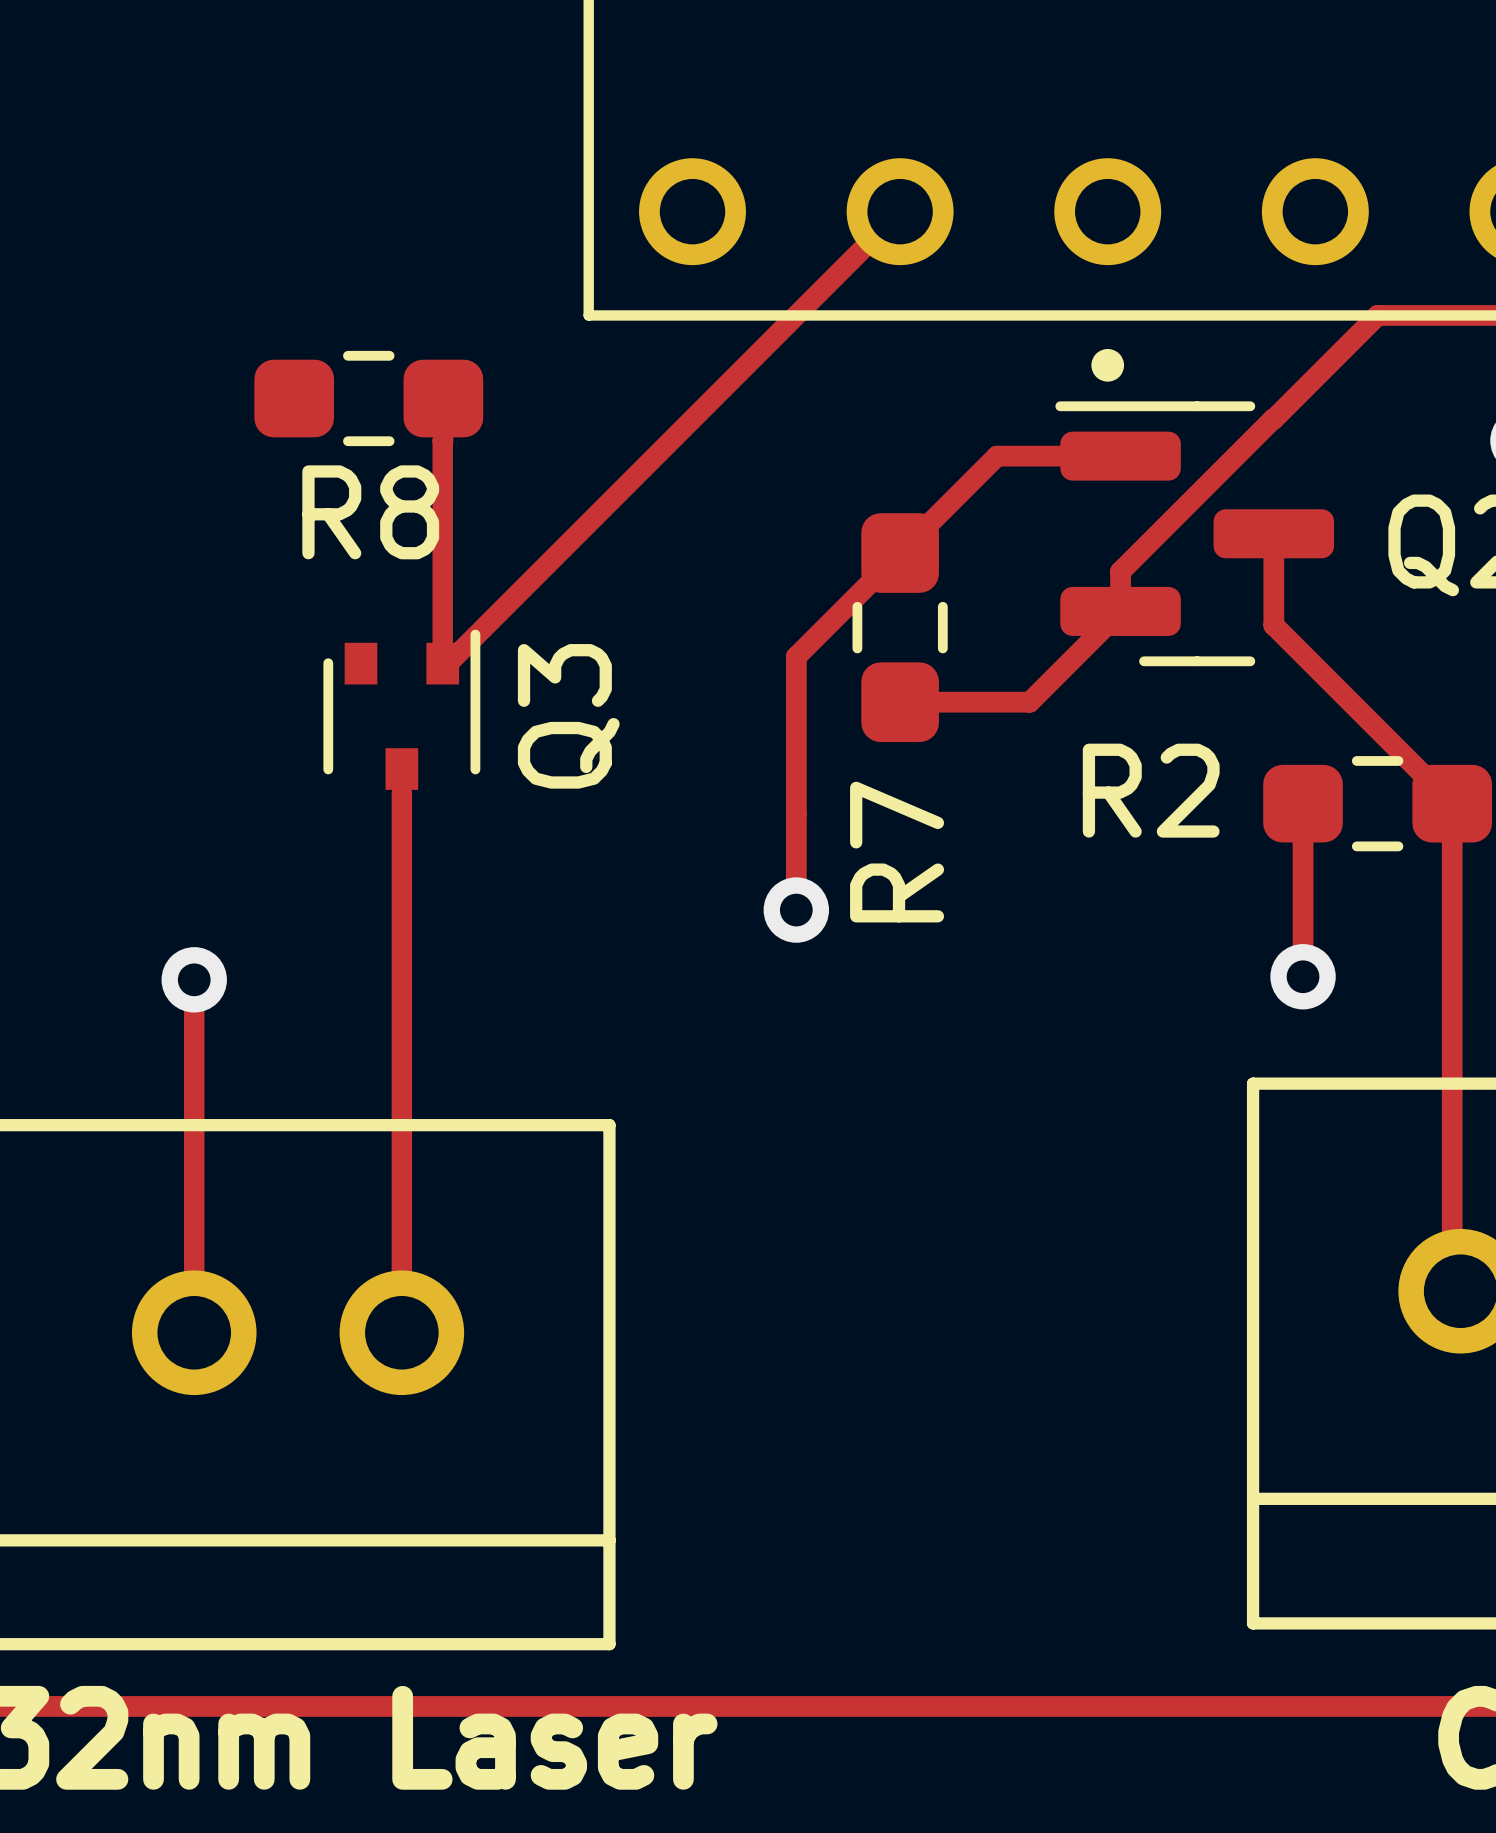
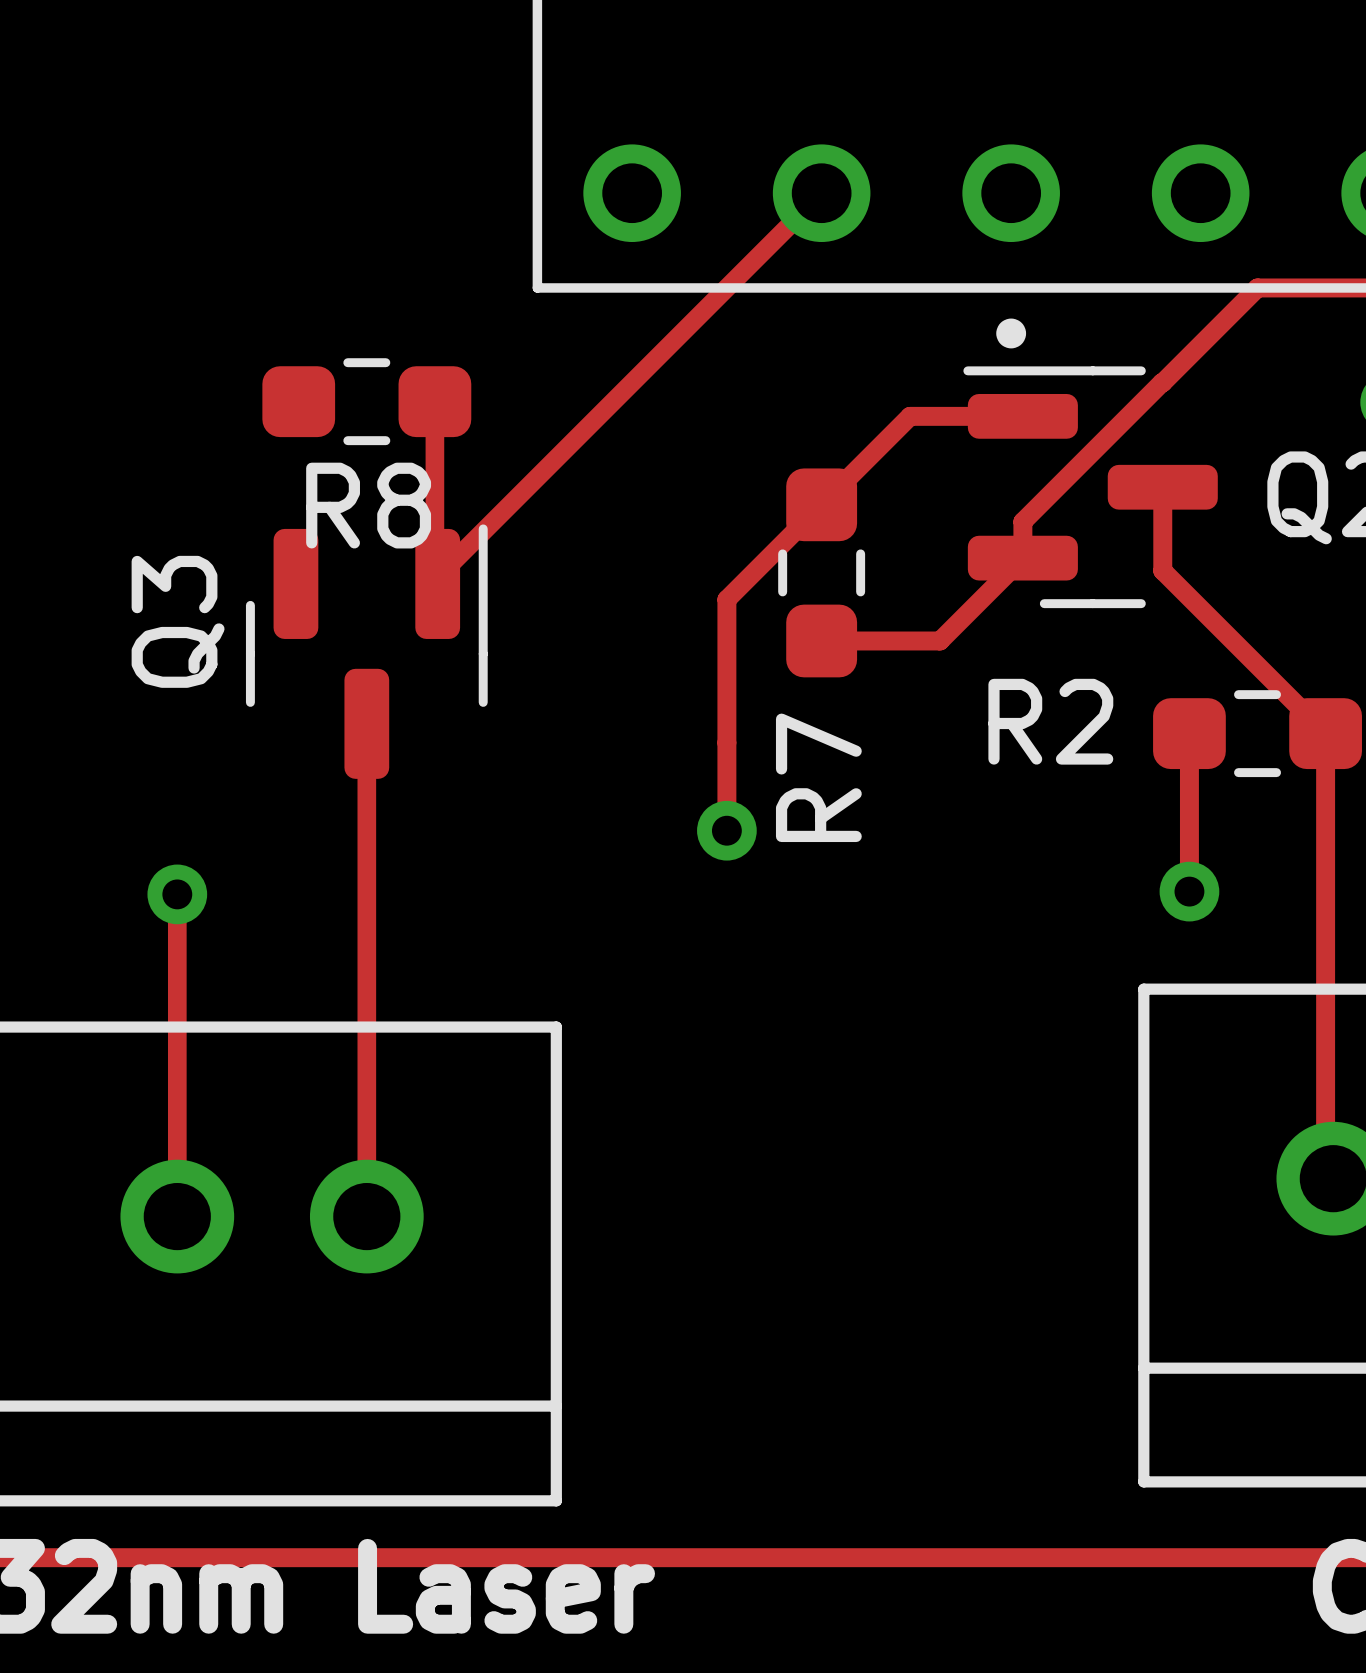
R8 position: (368, 398) -> (366, 401)
track: (442, 440) (442, 663) (448, 663) (479, 632) -> (434, 401) (434, 581) (437, 583) (437, 577)
Q3 footprint: [323, 629, 481, 790] -> [245, 524, 488, 779]
Q3 name position: Q3 (568, 716) -> Q3 (178, 621)

